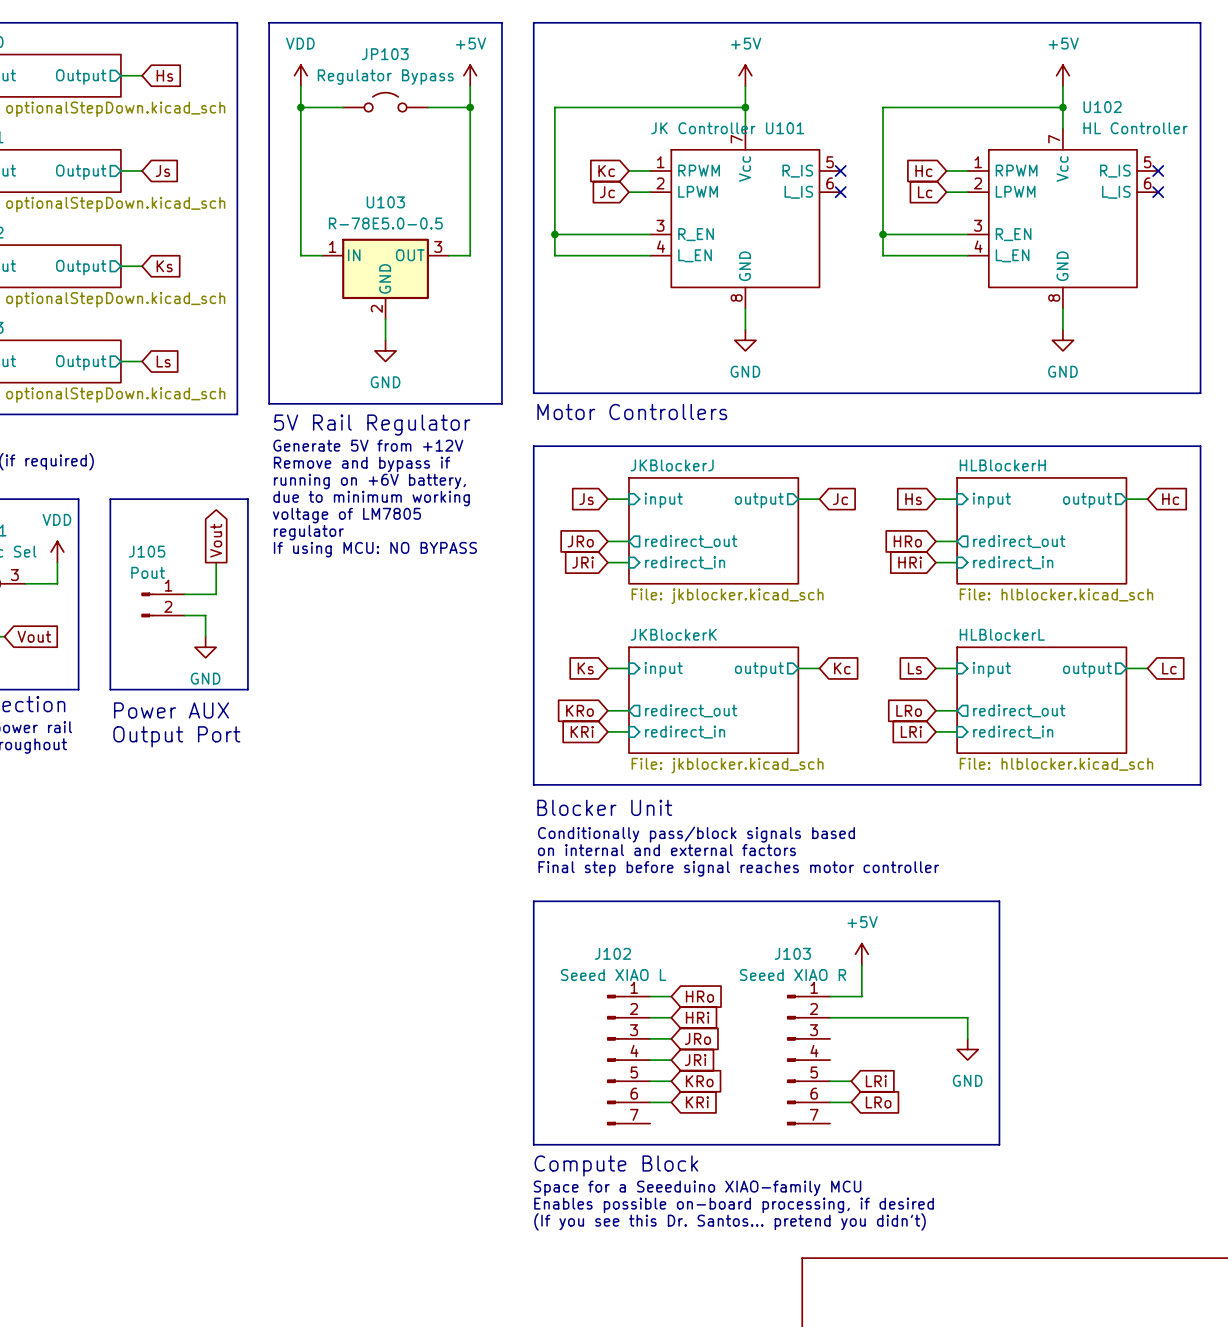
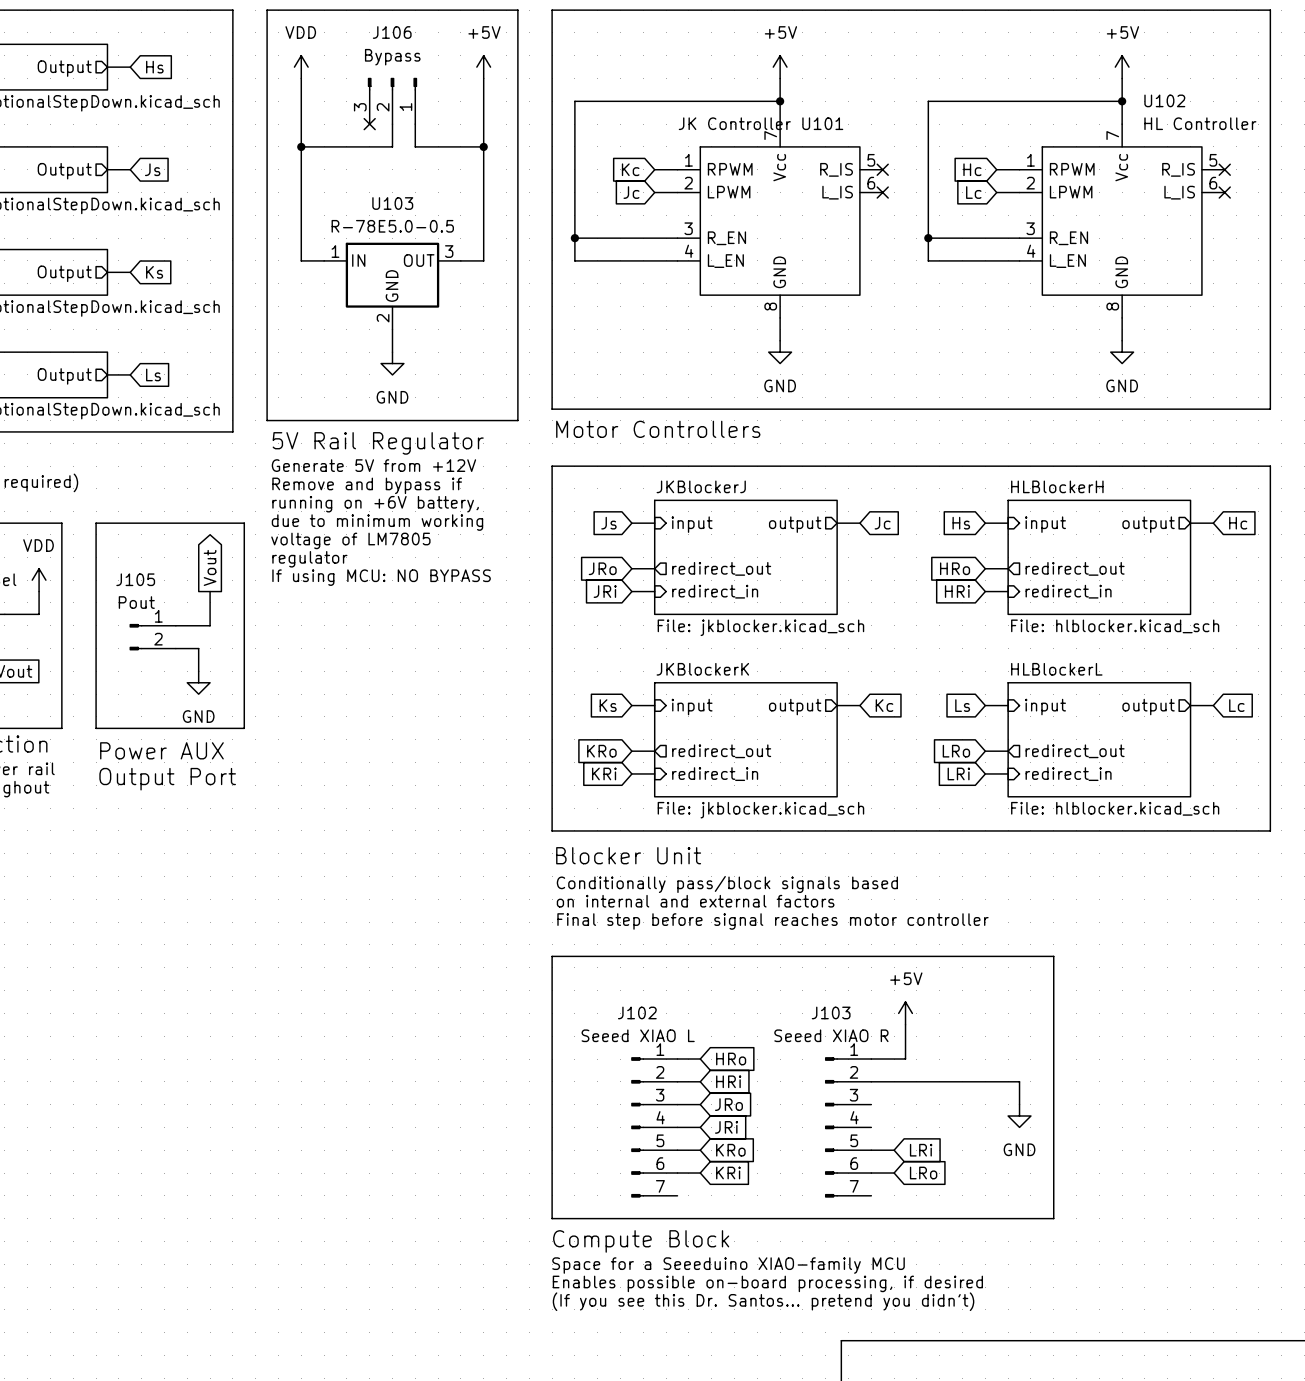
JP103: Regulator Bypass (385, 102) -> none
wire: (300, 107) (343, 107) -> none
junction position: (300, 107) -> (301, 146)
J106: none -> Bypass (392, 100)
wire: (427, 107) (470, 107) -> none
junction position: (470, 107) -> (483, 146)
no-connect mark: none -> (369, 124)
wire: none -> (392, 124) (392, 146) (301, 146)
wire: none -> (415, 124) (415, 146) (483, 146)

